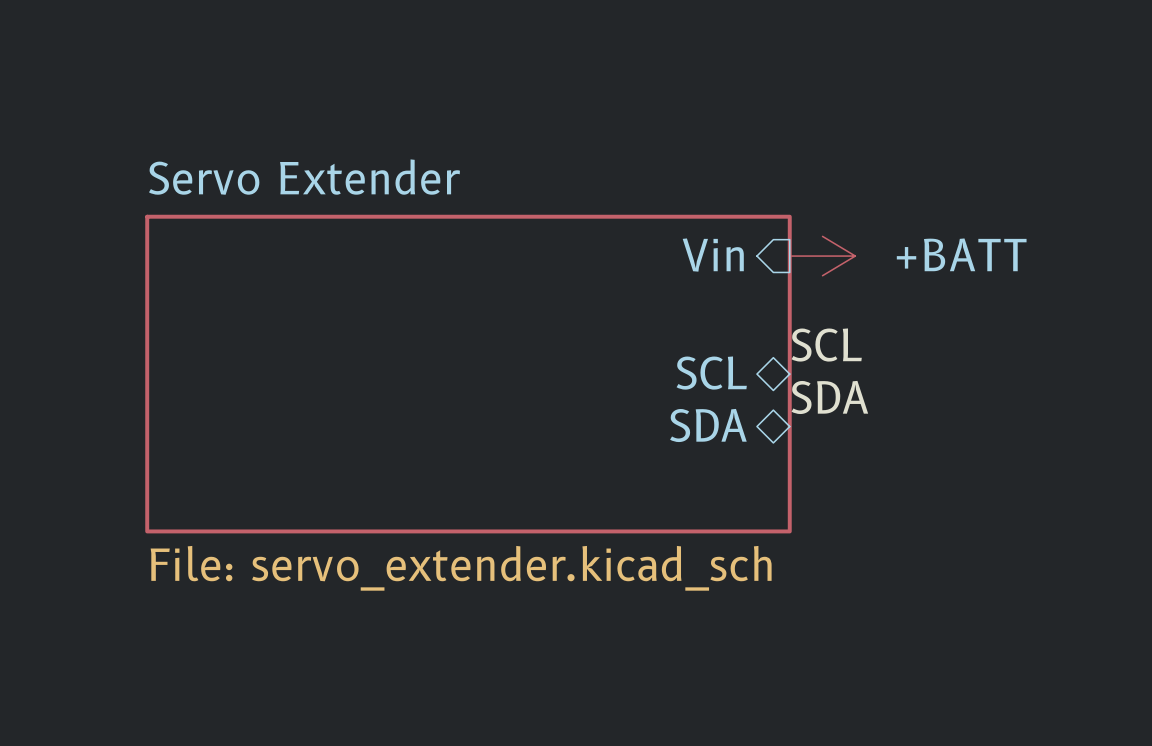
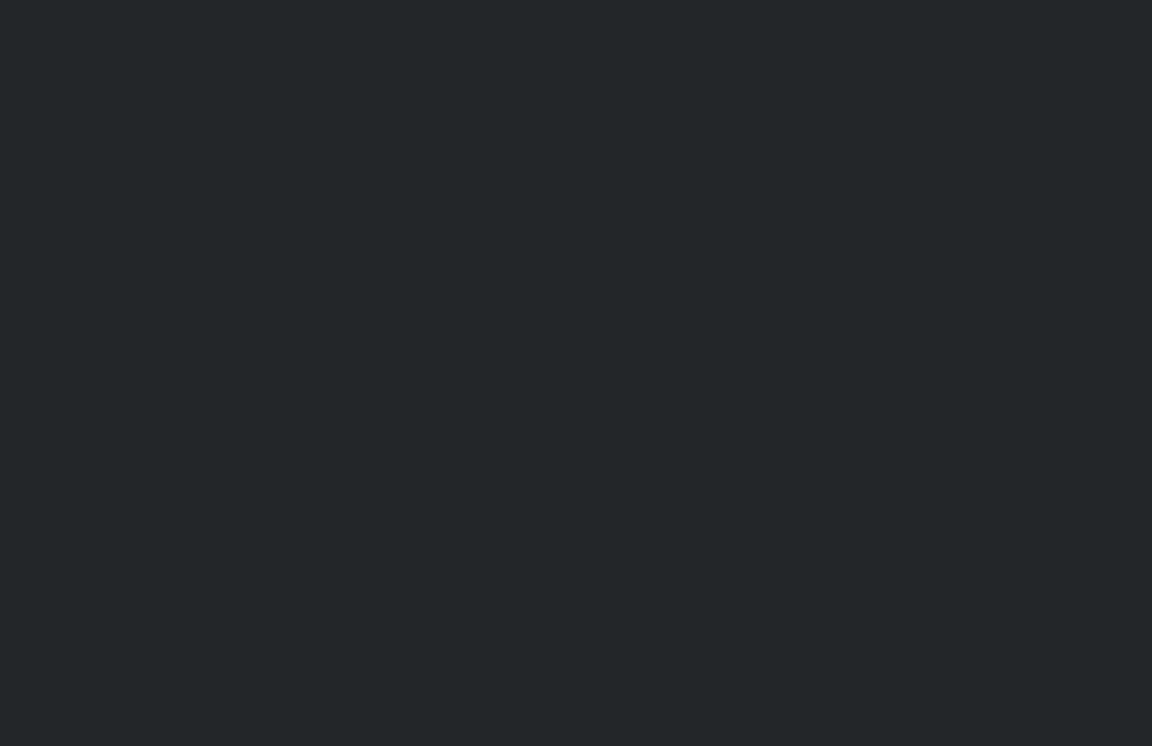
sheet pin: Vin (713, 255) -> none
power symbol: +BATT (822, 256) -> none
label: SCL (826, 345) -> none
sheet pin: SCL (711, 373) -> none
sheet Servo Extender: File: servo_extender.kicad_sch (468, 374) -> none
label: SDA (829, 397) -> none
sheet pin: SDA (708, 425) -> none

